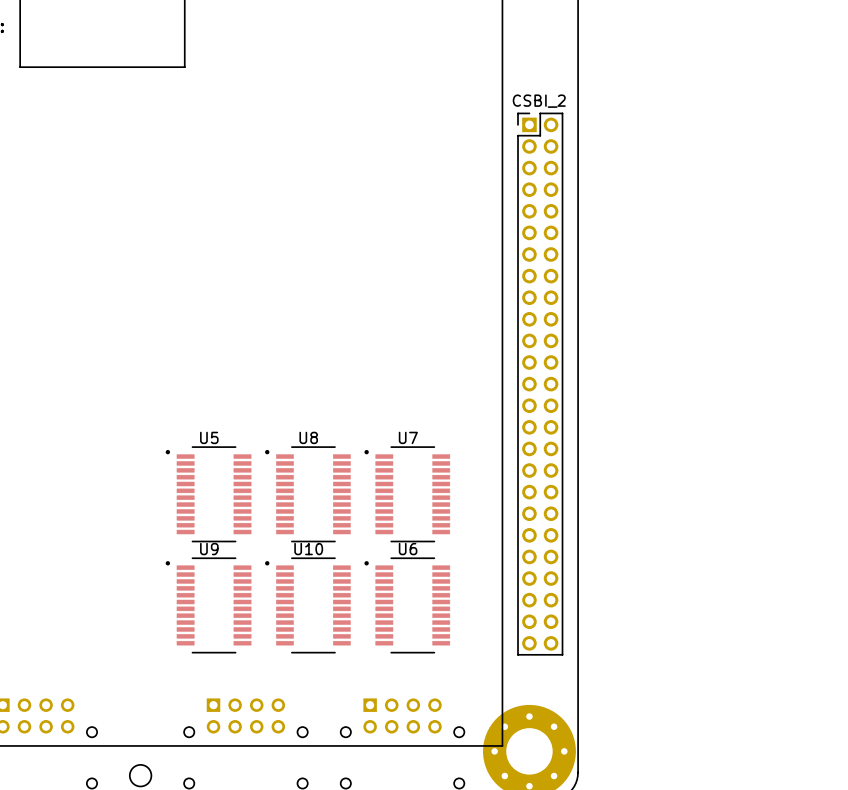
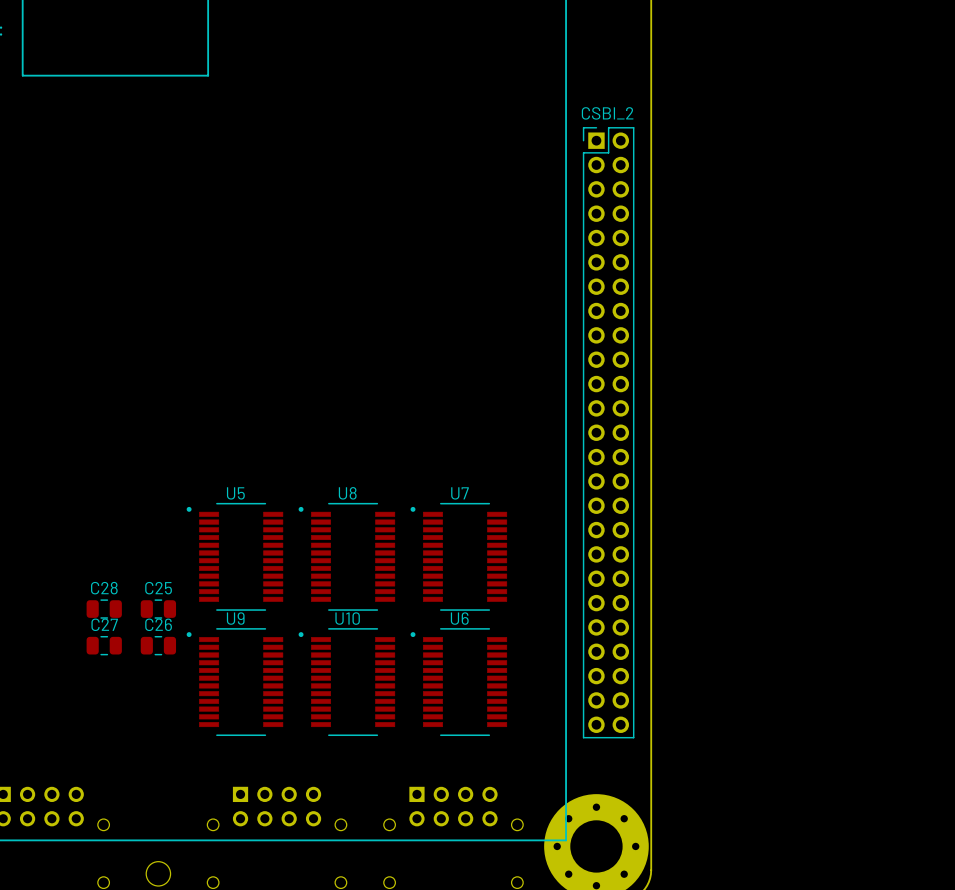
C28: none -> (104, 609)
C25: none -> (158, 609)
C27: none -> (104, 645)
C26: none -> (158, 645)

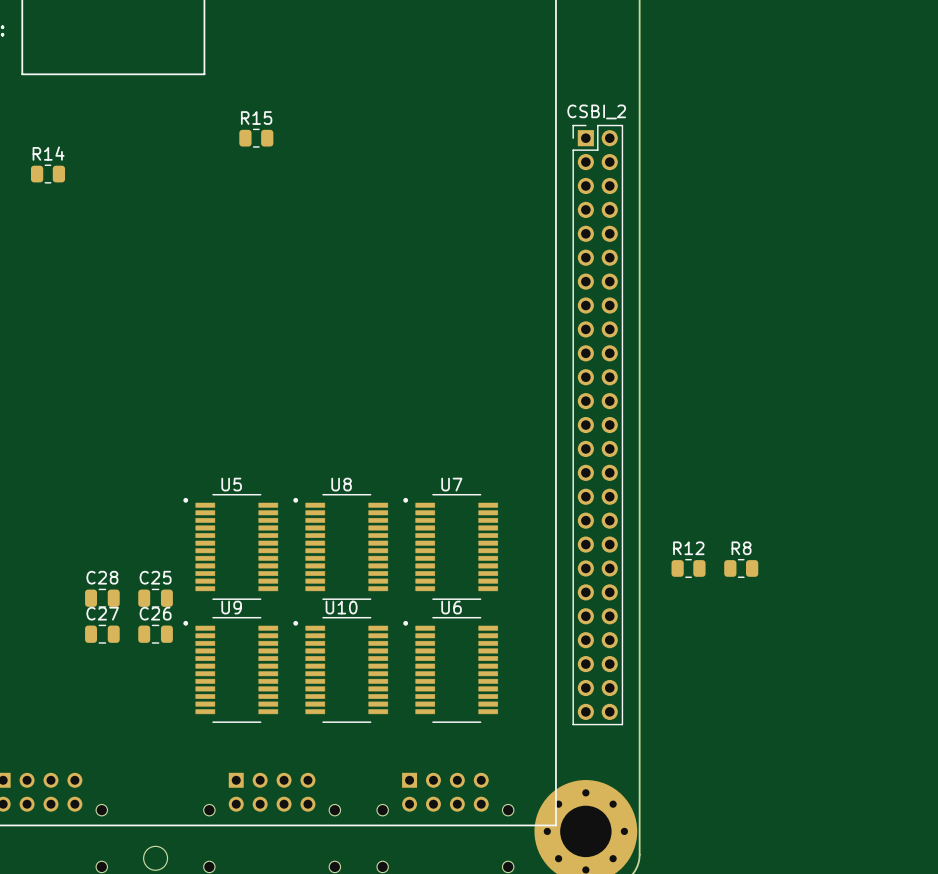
R15: none -> (256, 138)
R14: none -> (48, 174)
R12: none -> (688, 568)
R8: none -> (741, 568)

